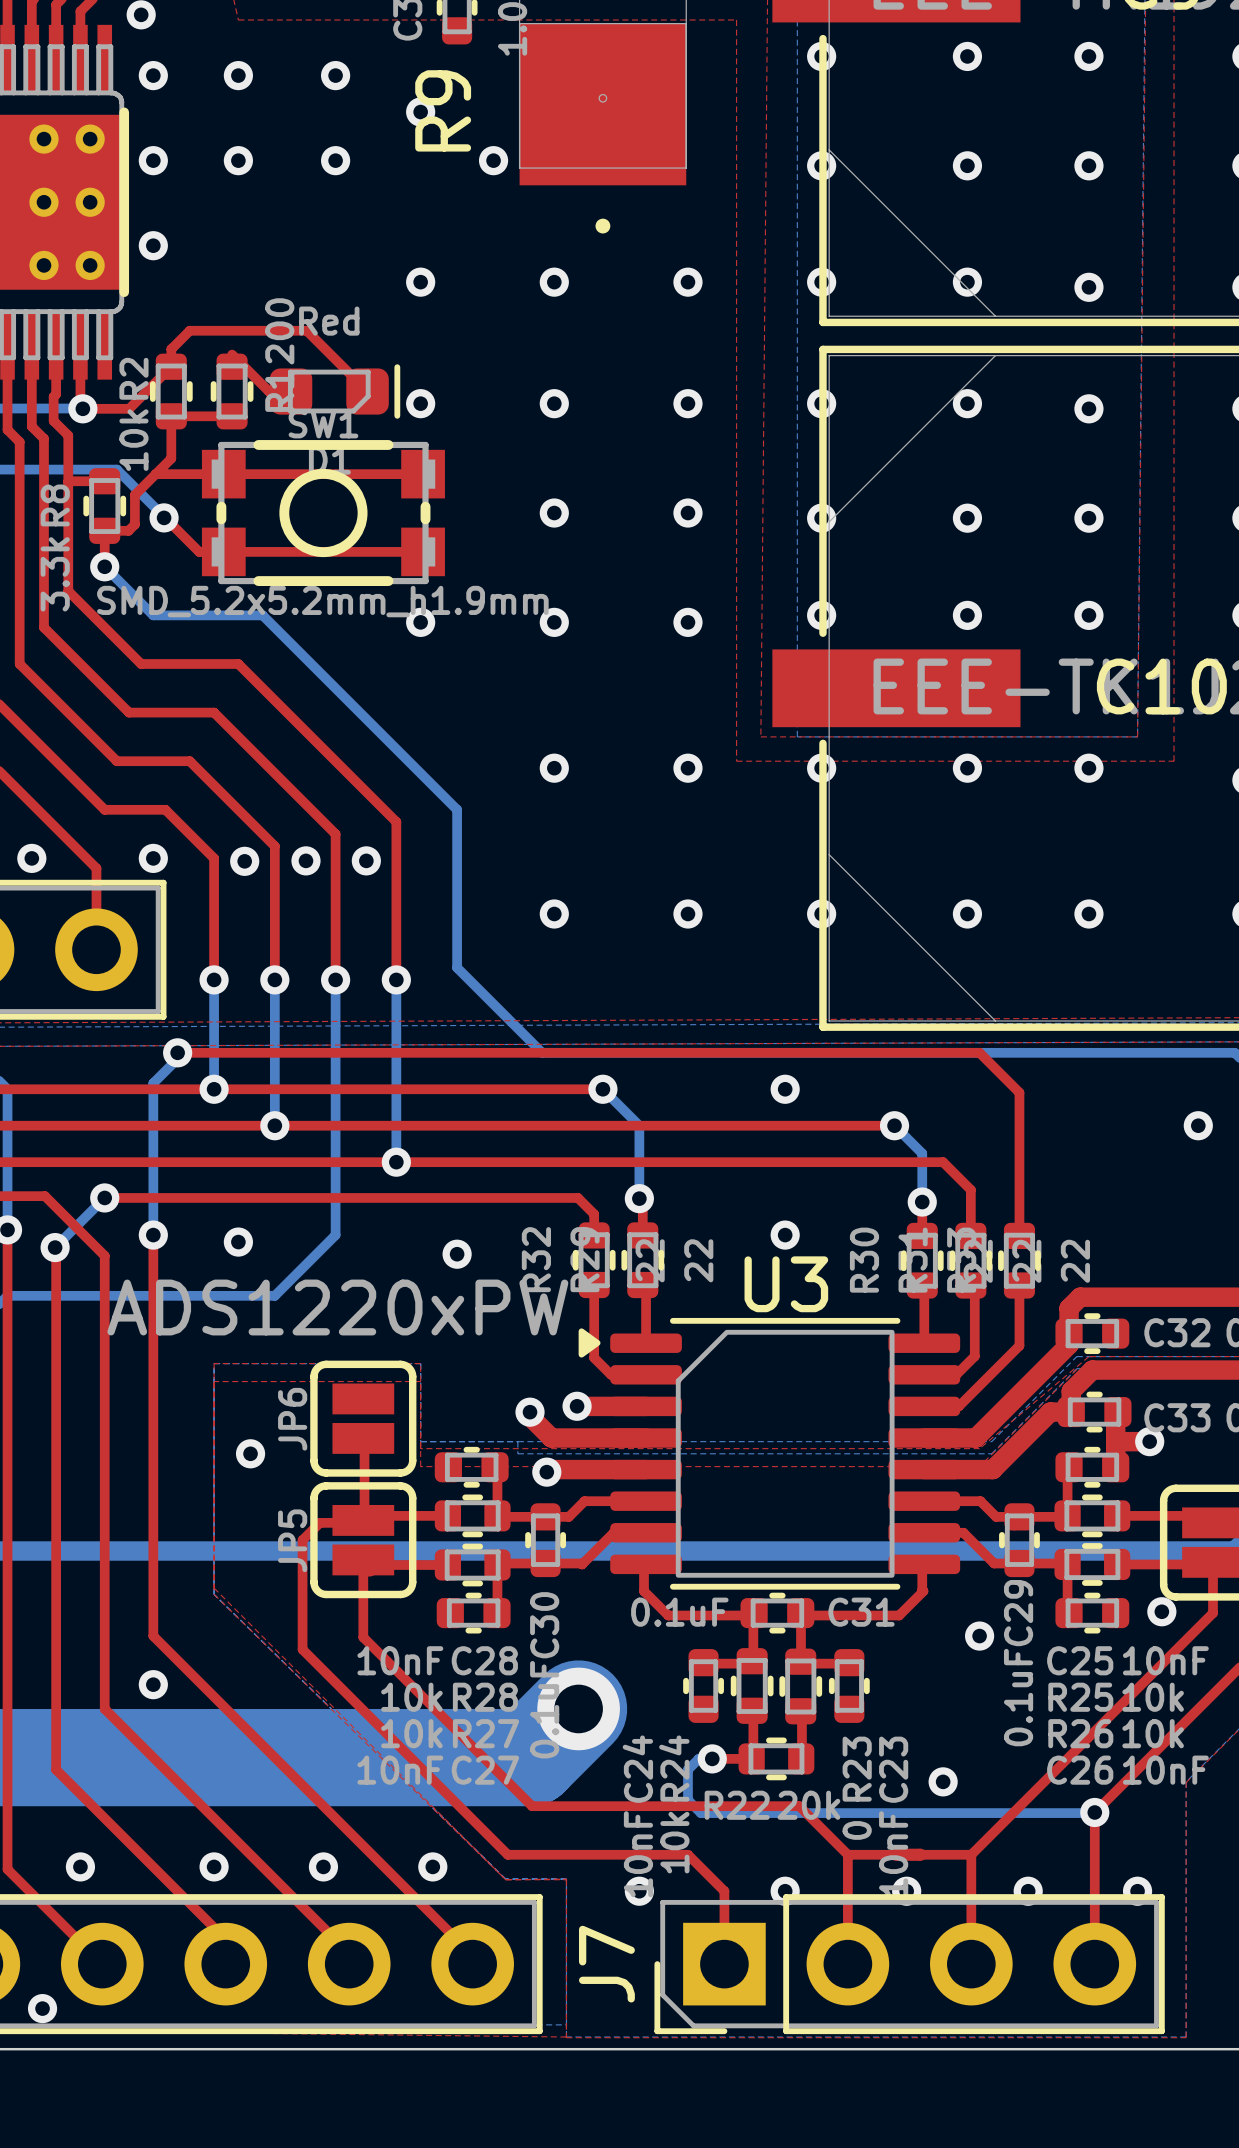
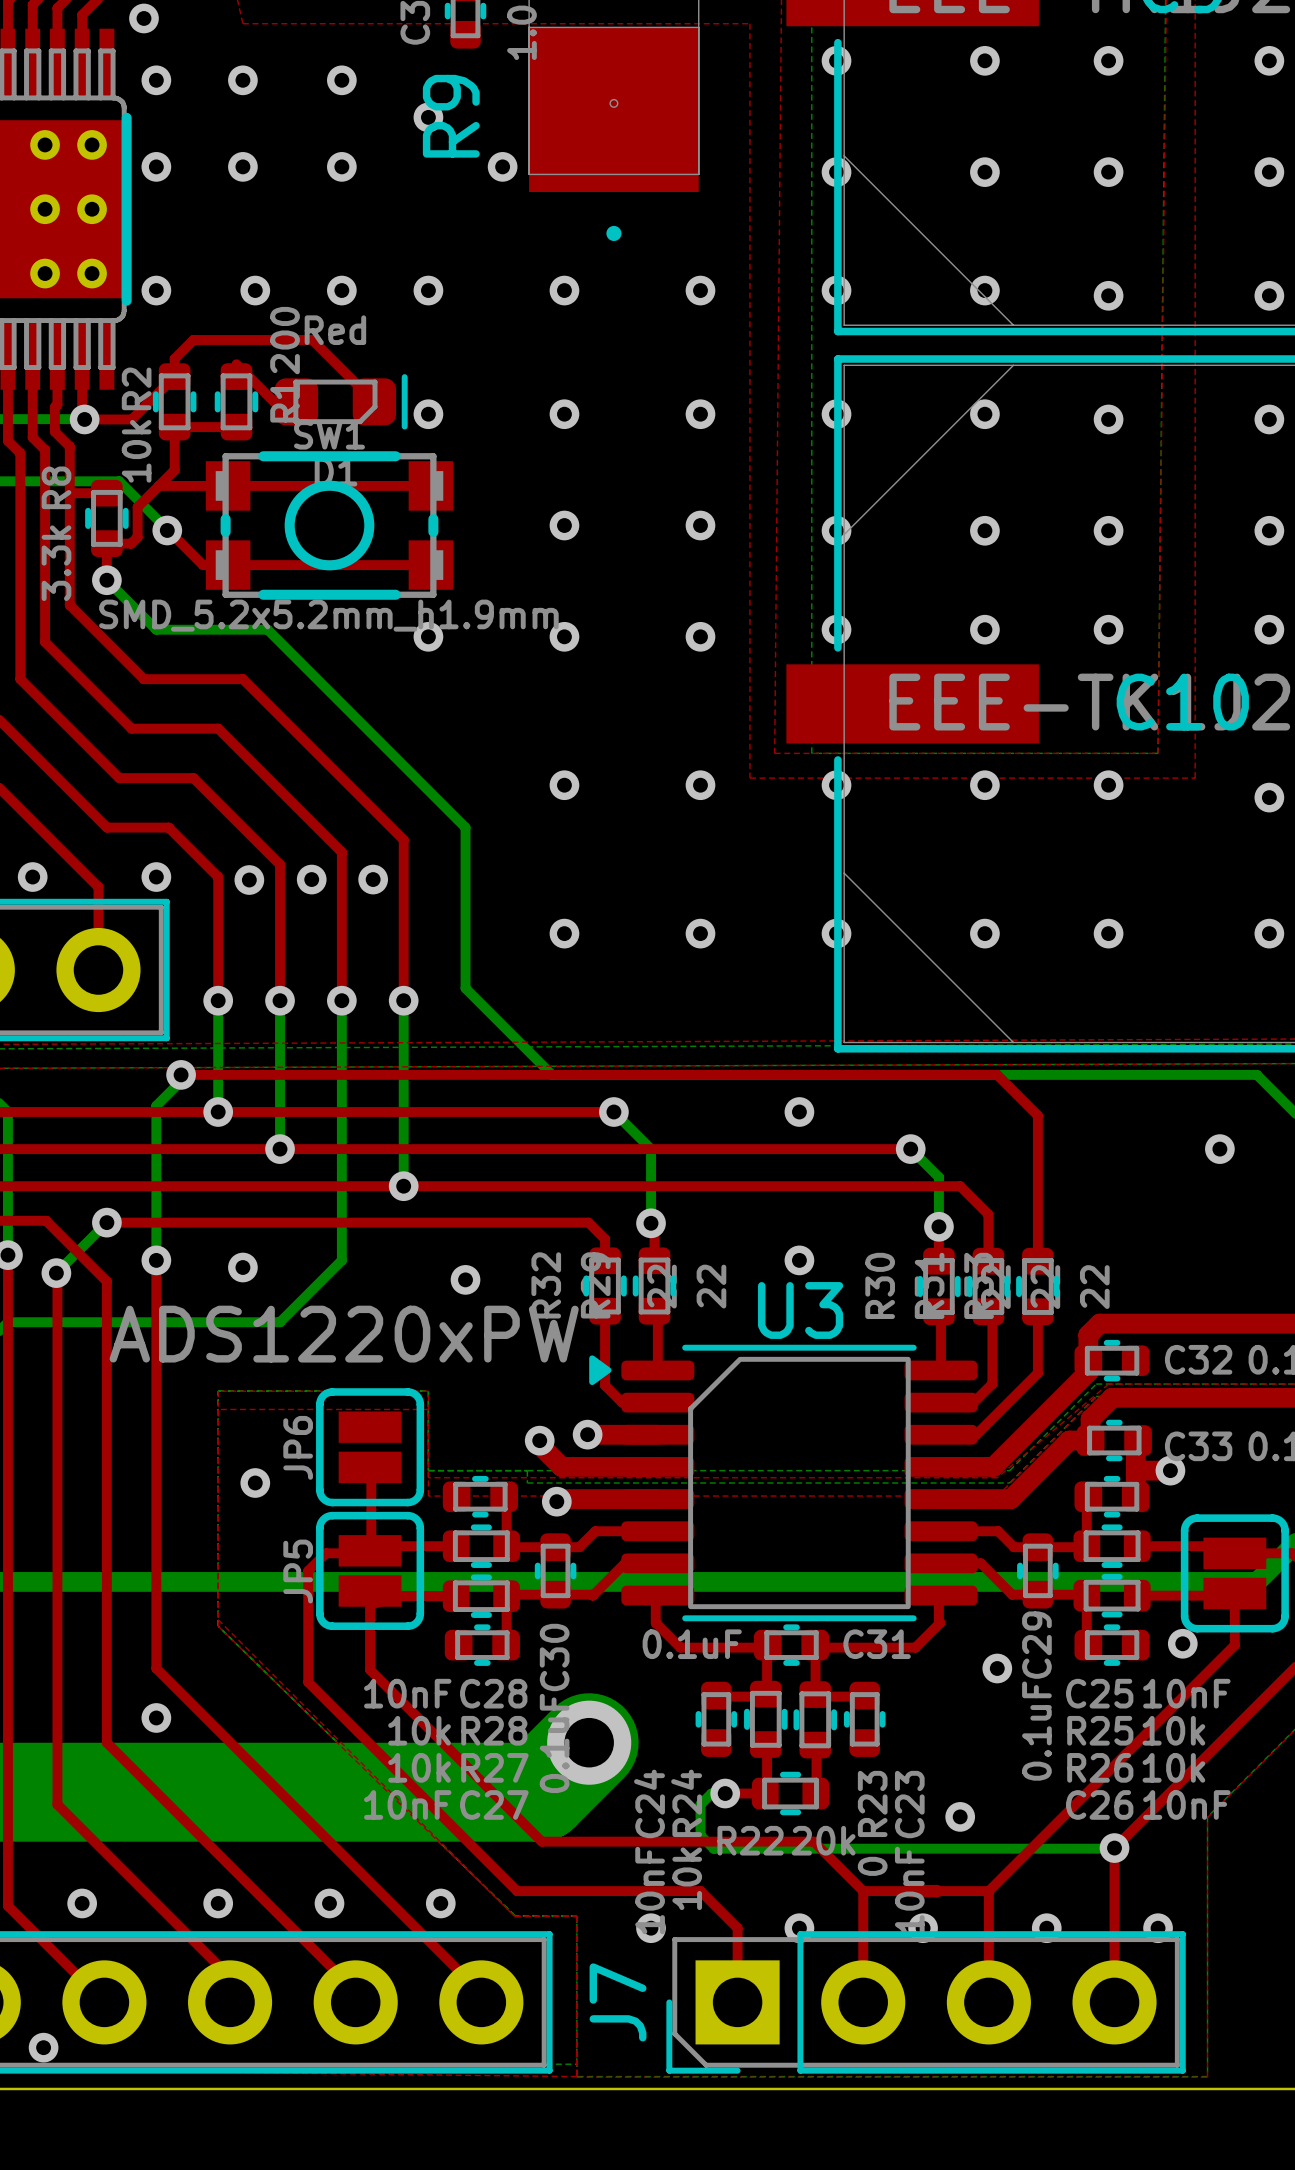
via position: (153, 245) -> (156, 290)
via: none -> (255, 290)
via: none -> (341, 290)
R8 name position: R8 (55, 505) -> R8 (56, 487)
R8 value position: 3.3k (55, 574) -> 3.3k (56, 563)

